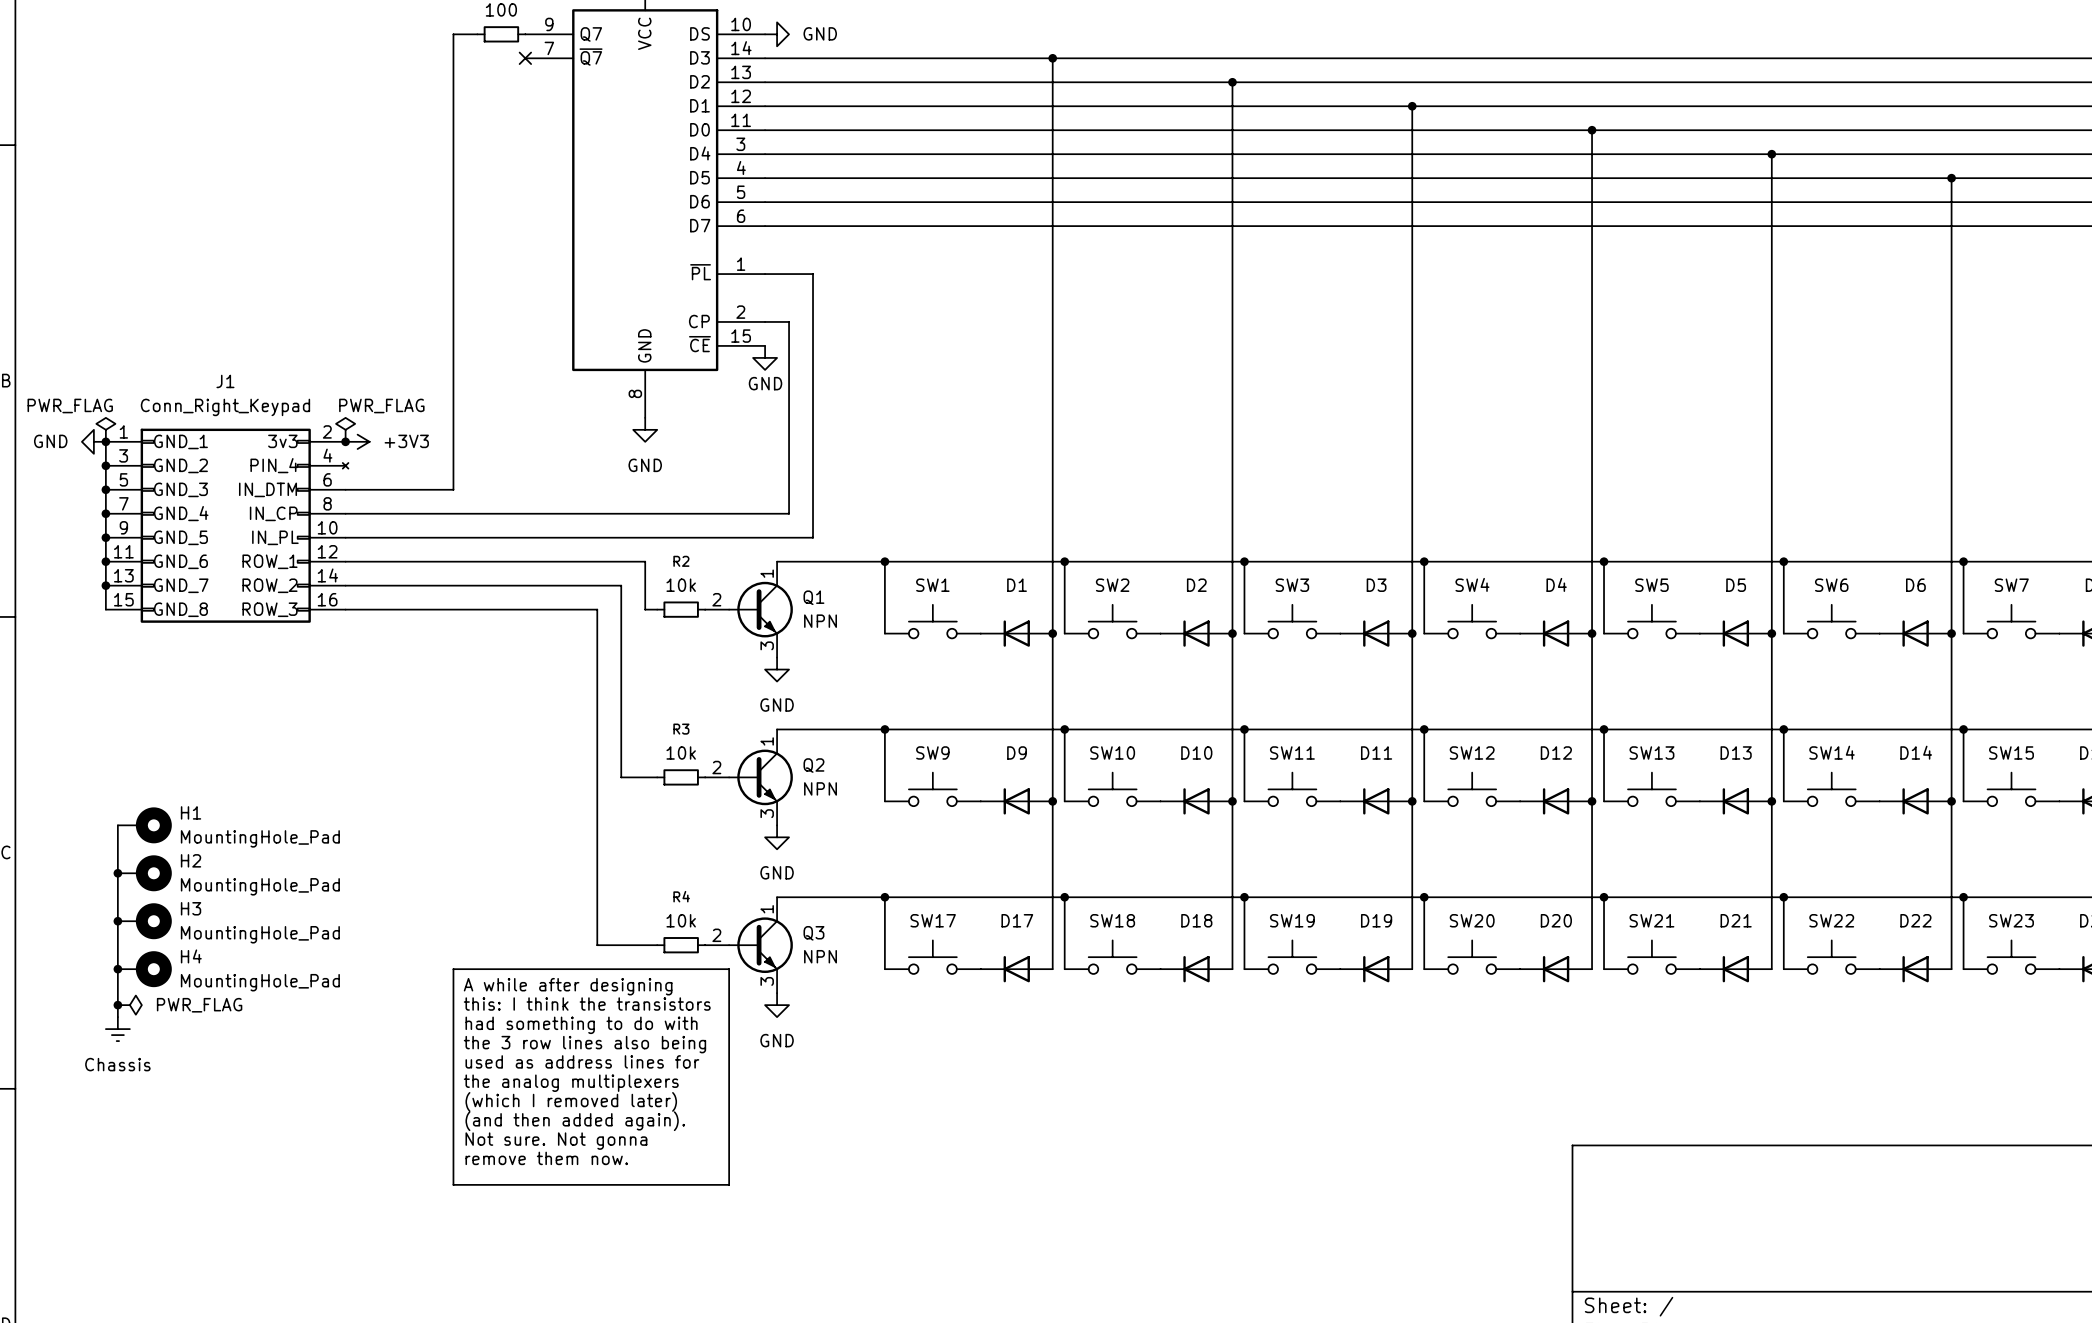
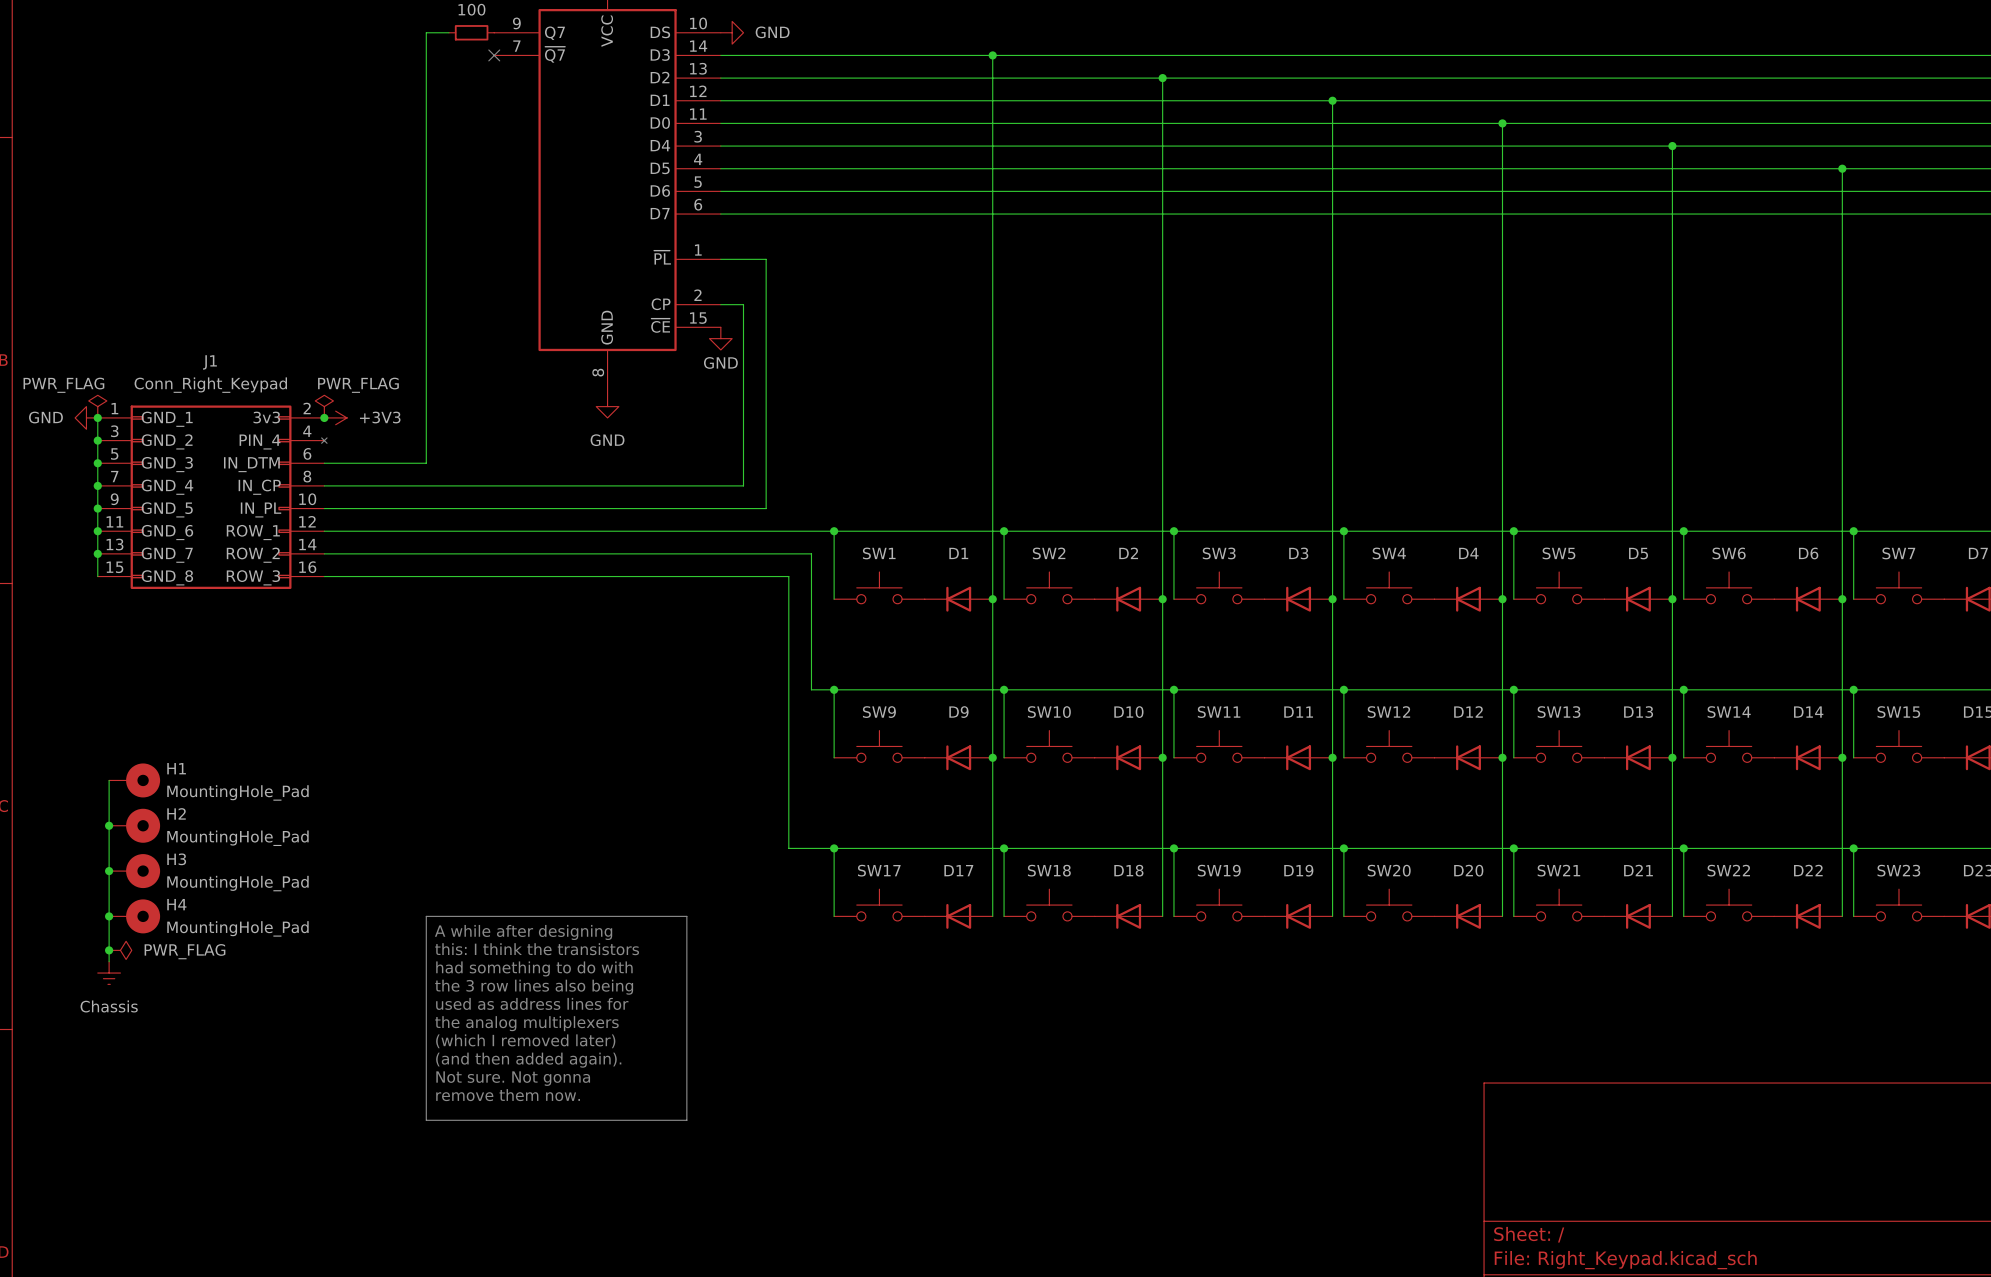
wire: (645, 561) (645, 609) -> (562, 576) (607, 576)
wire: none -> (607, 531) (732, 531)
wire: (621, 585) (621, 777) (657, 777) -> (584, 553) (811, 553) (811, 689)
wire: (597, 609) (597, 945) (657, 945) -> none
R2: 10k (681, 609) -> none
Q1: NPN (749, 609) -> none
power symbol: GND (777, 669) -> none
wire: (777, 729) (860, 729) -> none
R3: 10k (681, 777) -> none
Q2: NPN (749, 777) -> none
power symbol: GND (777, 837) -> none
wire: (777, 897) (836, 897) -> (618, 576) (788, 576) (788, 848)
R4: 10k (681, 945) -> none
Q3: NPN (749, 945) -> none
power symbol: GND (777, 1005) -> none

